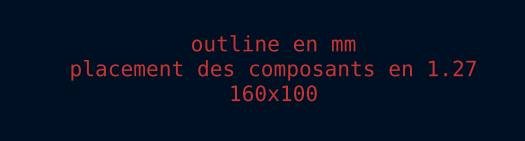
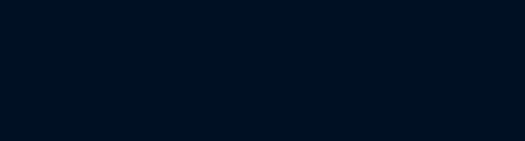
text: outline en mm (273, 43) -> none
text: placement des composants en 1.27 (273, 70) -> none
text: 160x100 (274, 93) -> none

